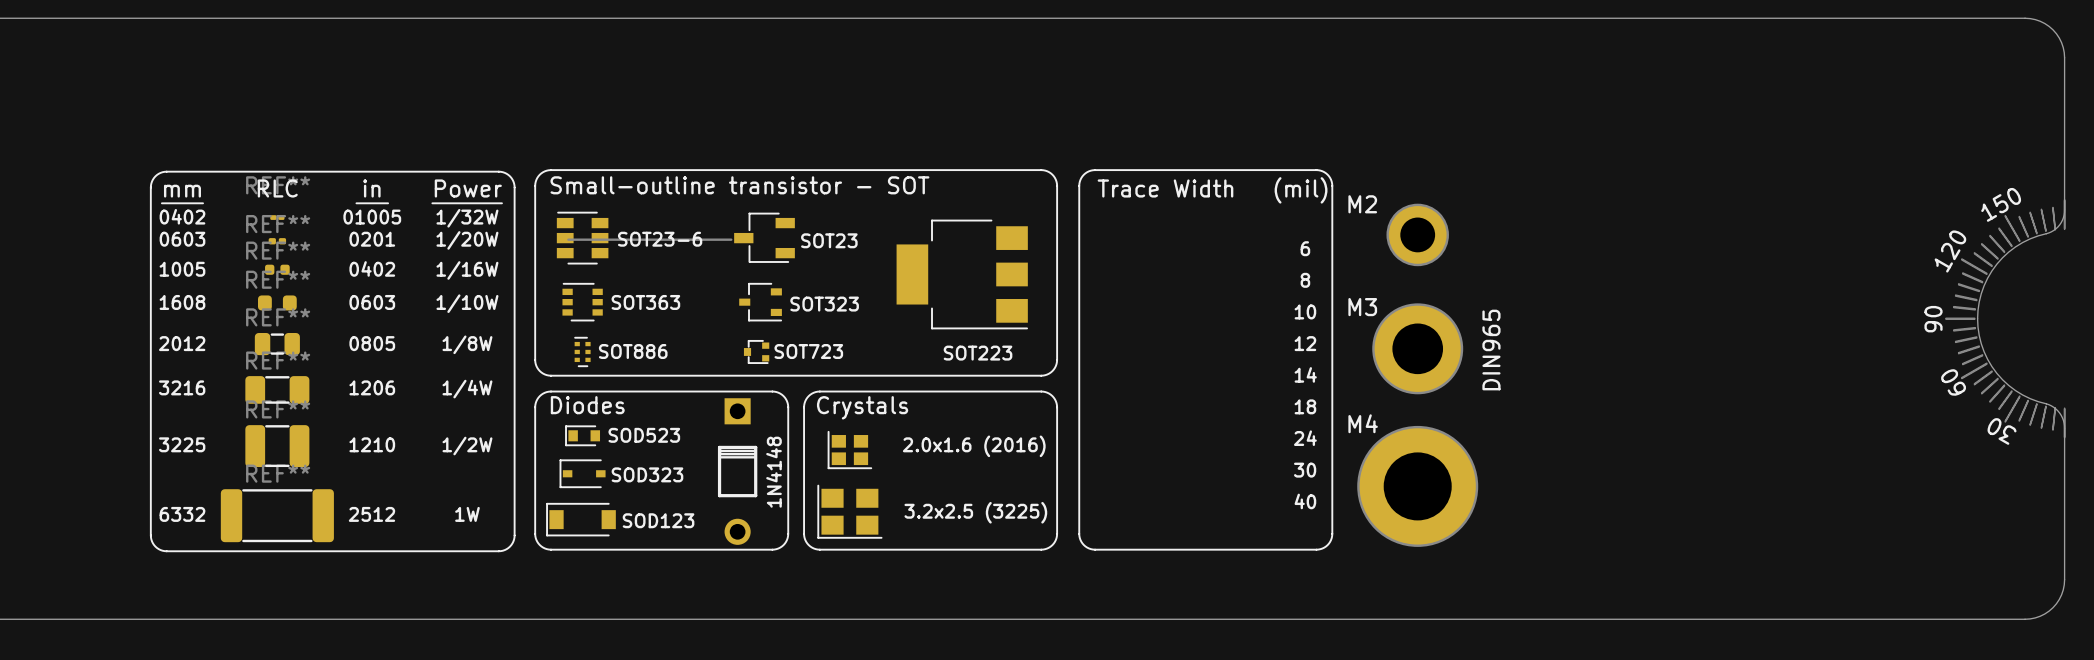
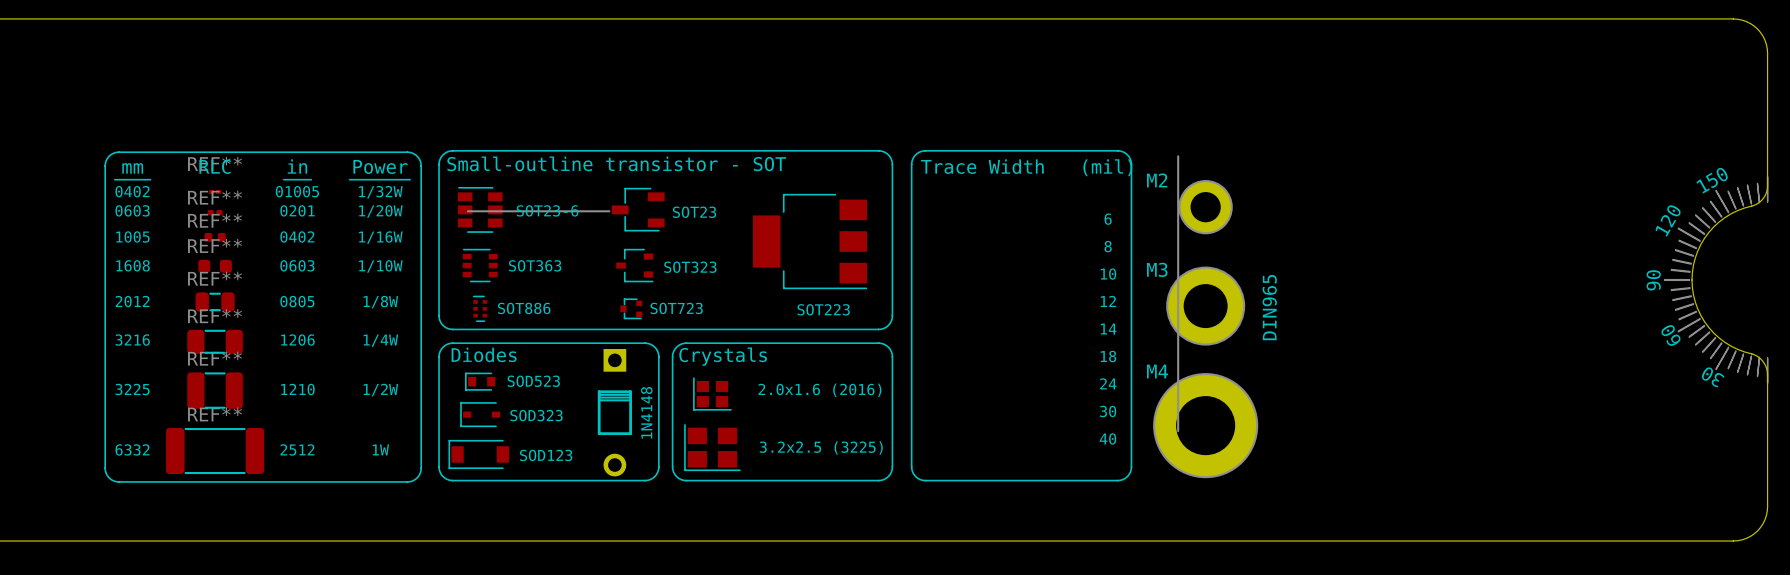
line: none -> (1178, 156) (1178, 431)

